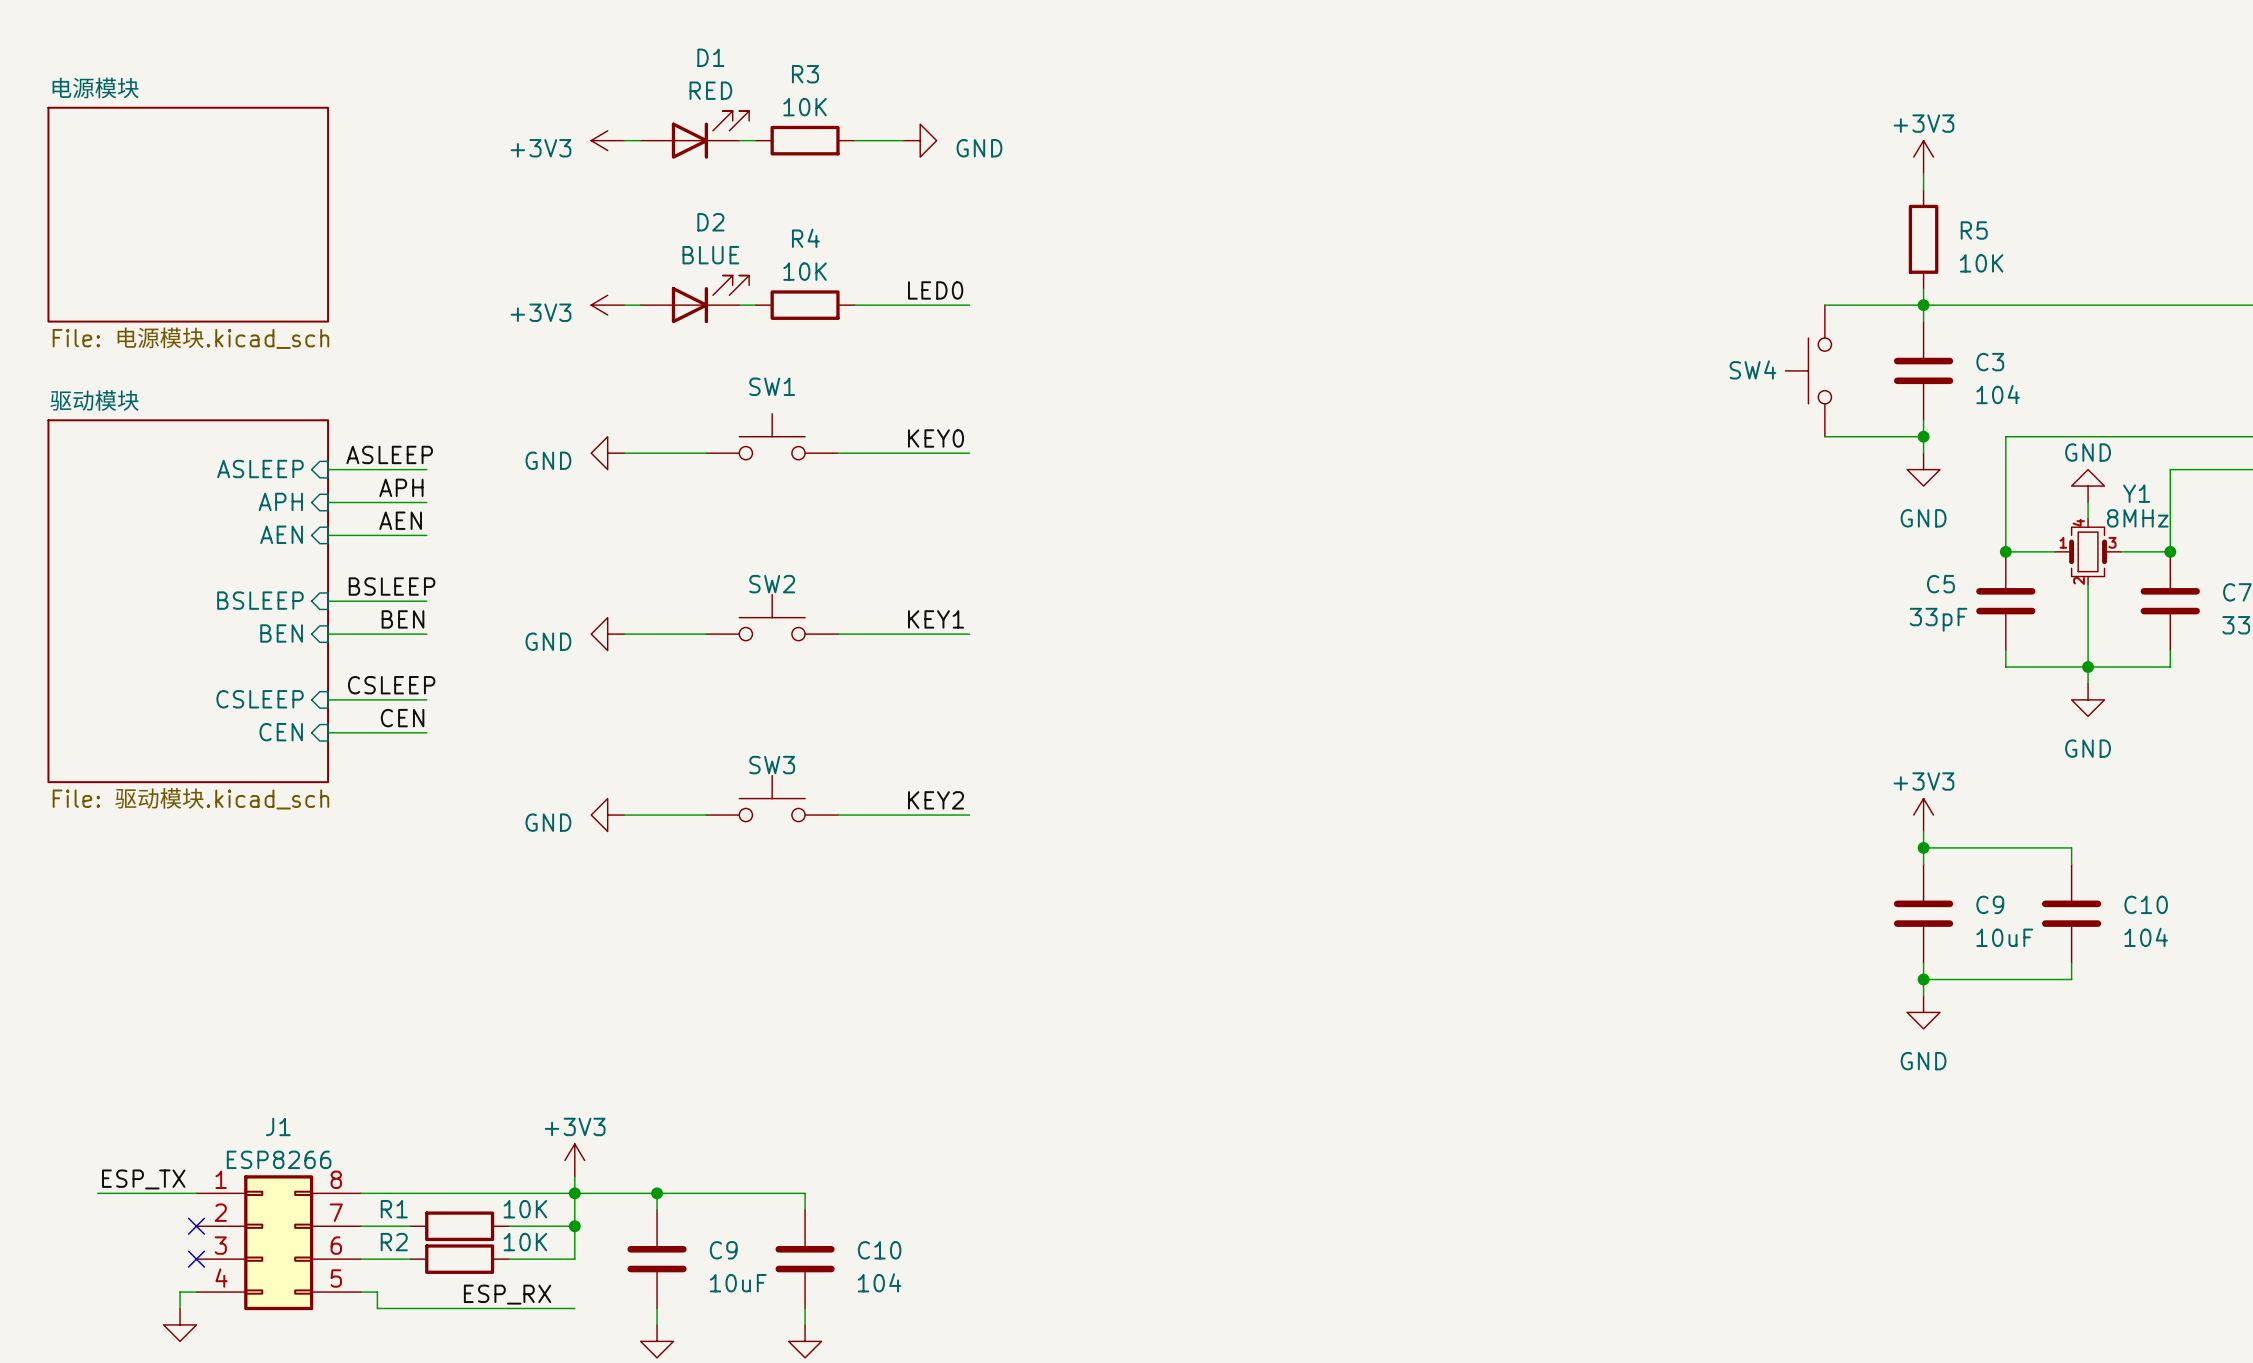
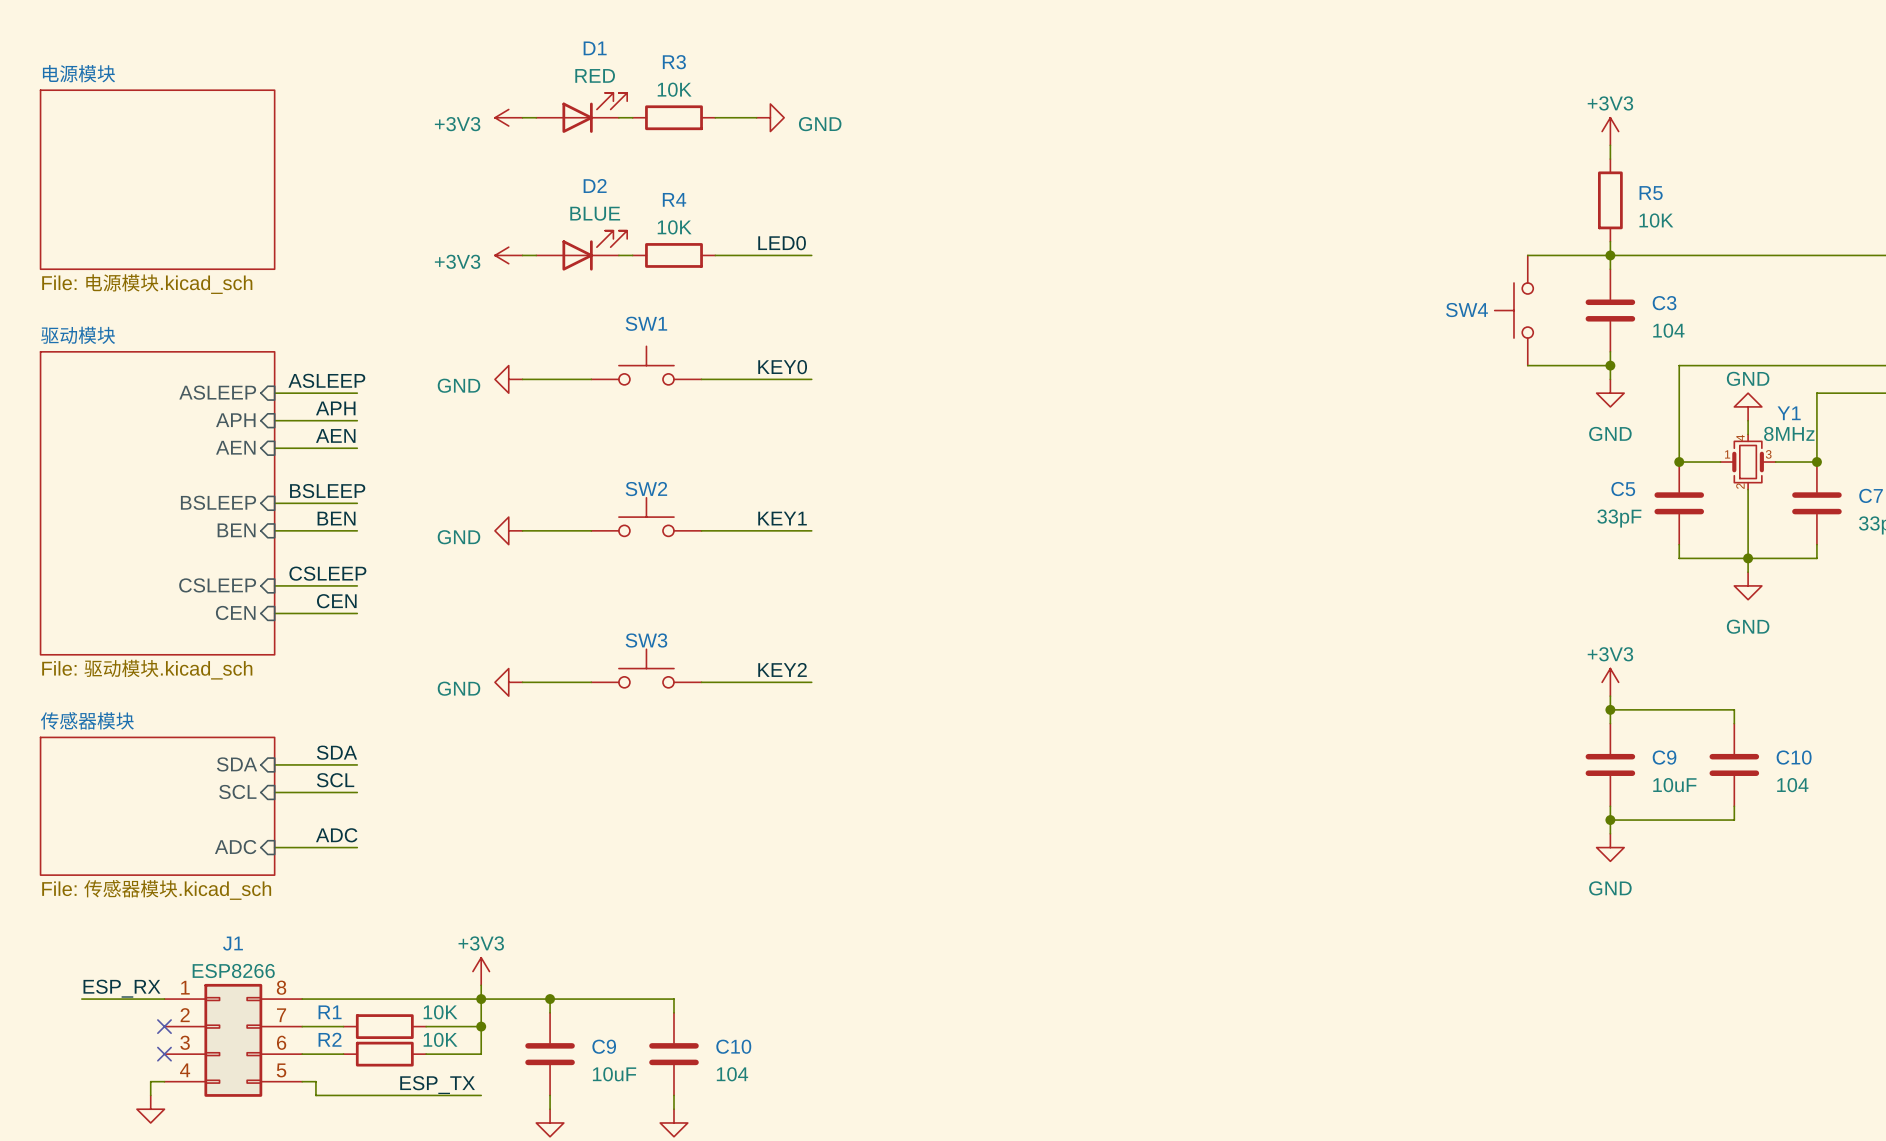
label: none -> SDA (336, 752)
sheet pin: none -> SDA (237, 764)
wire: none -> (274, 764) (357, 764)
label: none -> SCL (335, 780)
sheet pin: none -> SCL (237, 791)
wire: none -> (274, 792) (357, 792)
sheet 传感器模块: none -> File: 传感器模块.kicad_sch (157, 806)
label: none -> ADC (336, 835)
sheet pin: none -> ADC (235, 847)
wire: none -> (274, 847) (357, 847)
label: ESP_TX (143, 1179) -> ESP_RX (121, 988)
label: ESP_RX (507, 1294) -> ESP_TX (437, 1085)

